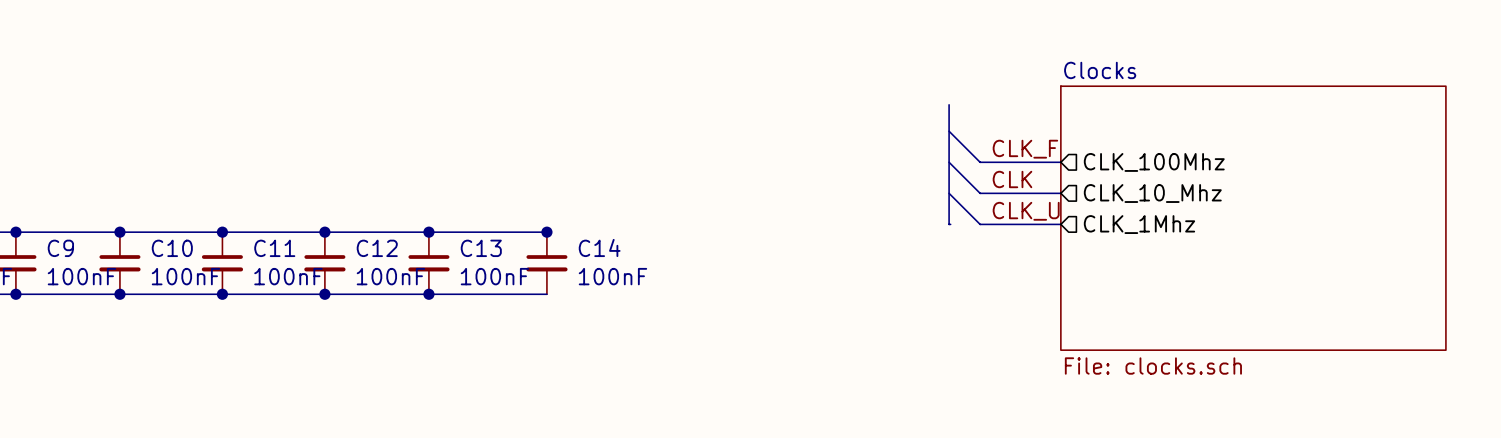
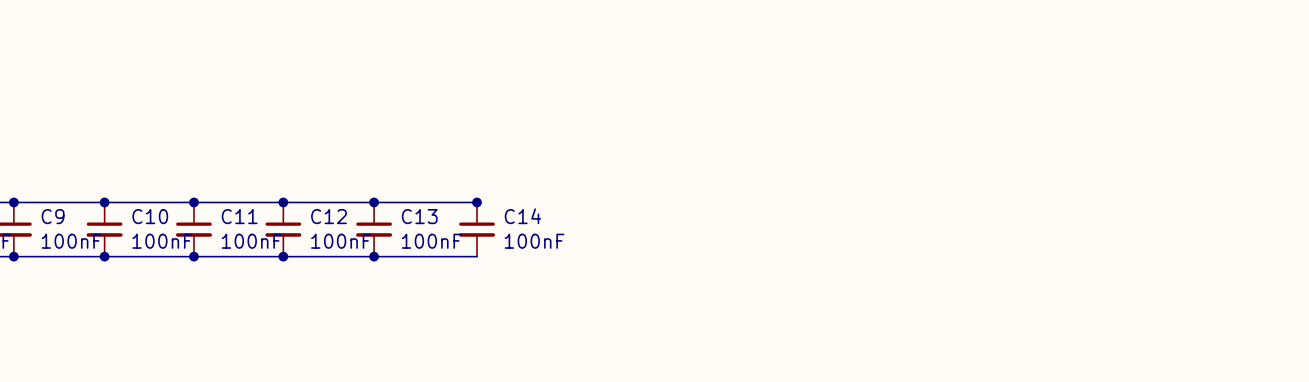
bus: (949, 104) (949, 224) (950, 224) -> none
wire: (949, 131) (980, 162) (1060, 162) -> none
label: CLK_F (1025, 149) -> none
wire: (949, 162) (980, 193) (1060, 193) -> none
sheet pin: CLK_100Mhz (1154, 162) -> none
label: CLK (1012, 179) -> none
wire: (949, 193) (980, 224) (1060, 224) -> none
sheet pin: CLK_10_Mhz (1152, 193) -> none
label: CLK_U (1026, 211) -> none
sheet Clocks: File: clocks.sch (1253, 218) -> none
sheet pin: CLK_1Mhz (1139, 224) -> none

